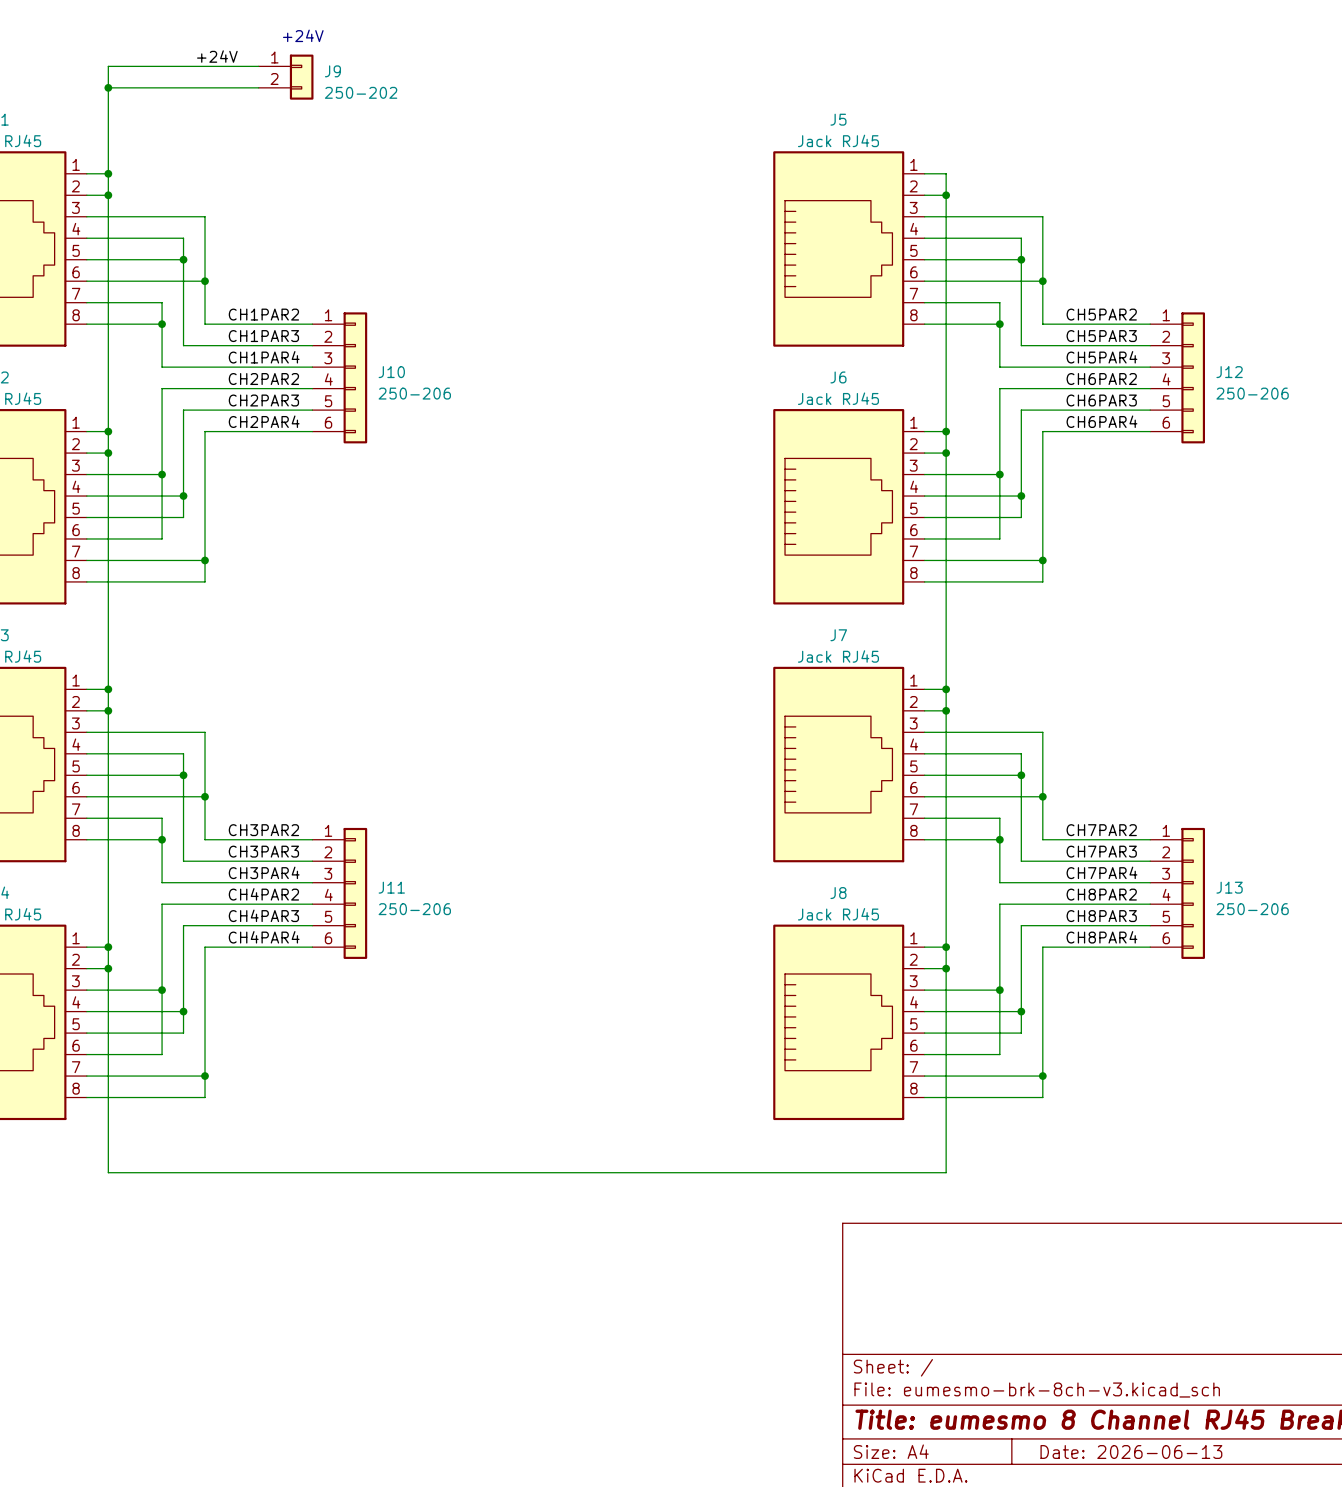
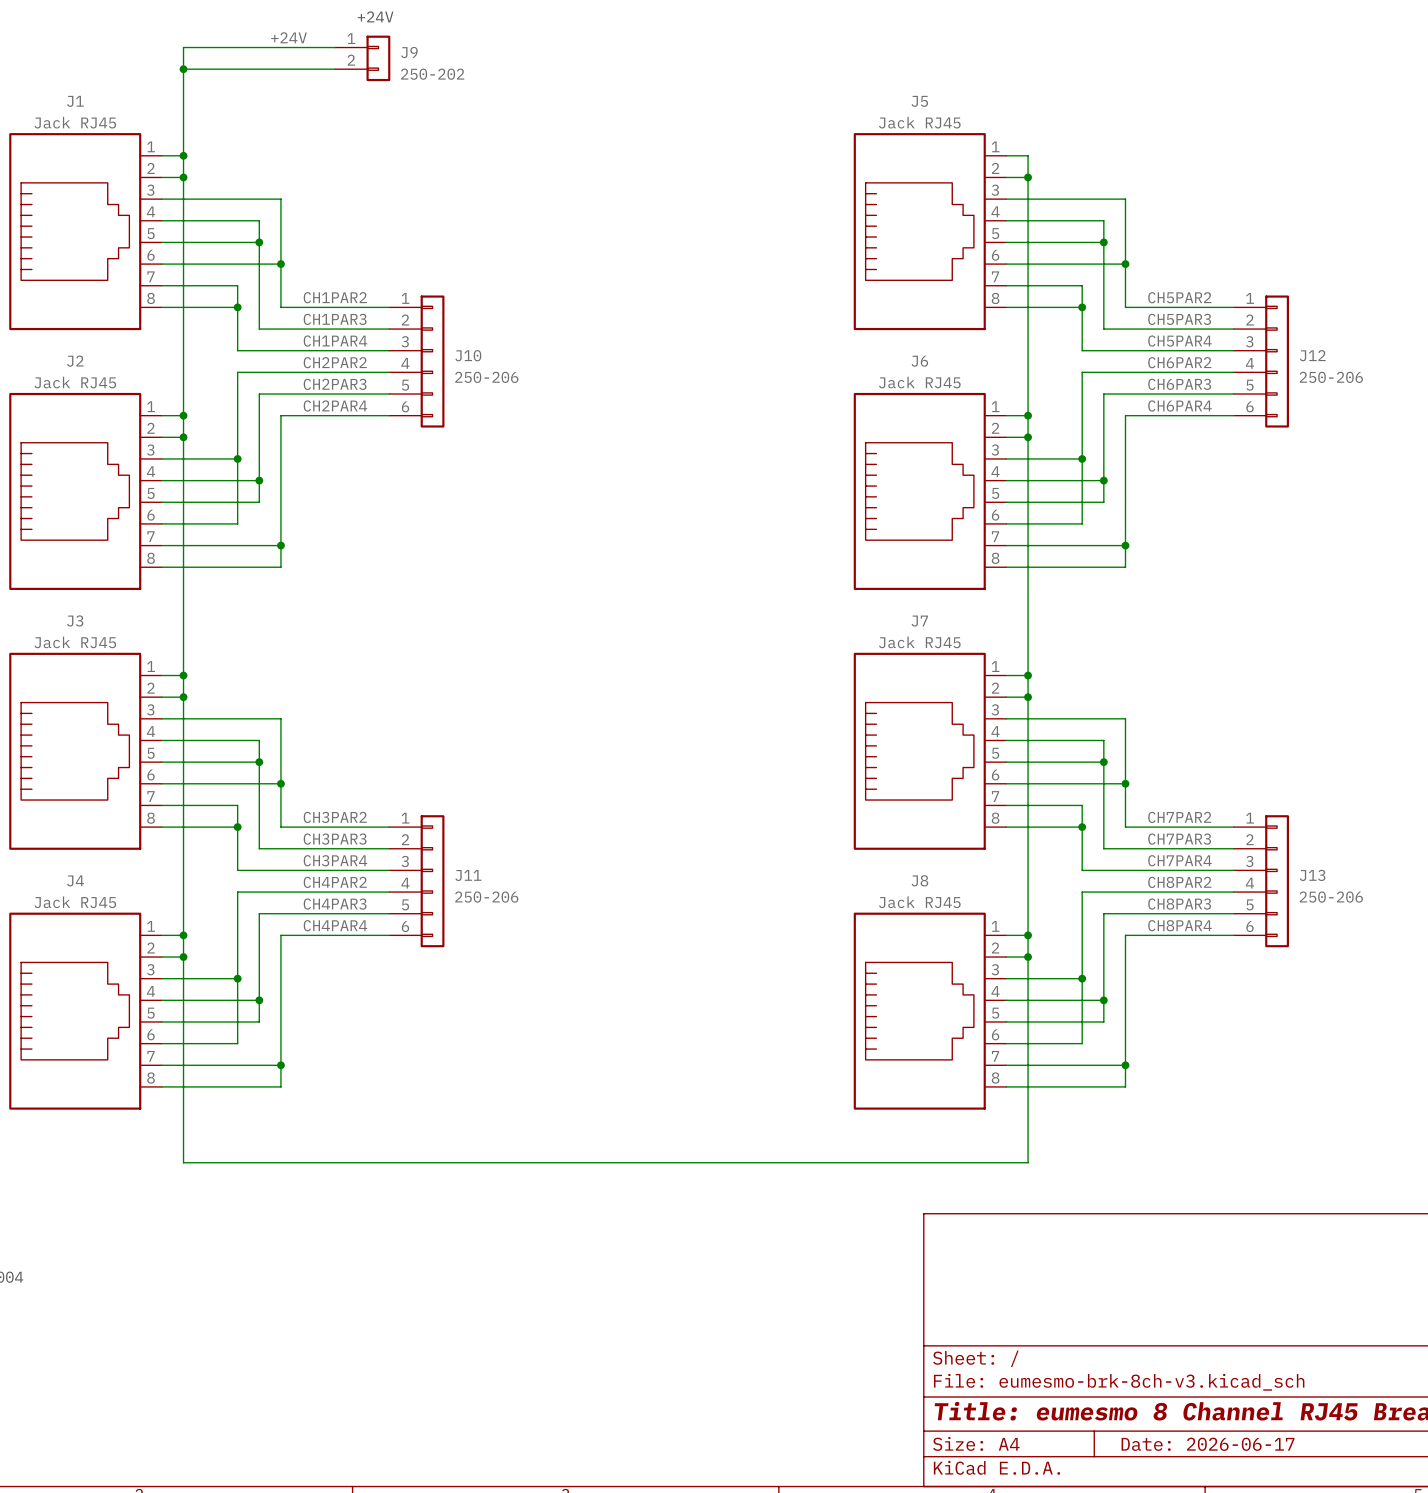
title block: Date: 2026-06-13 (1131, 1452) -> Date: 2026-06-17 (1208, 1444)

